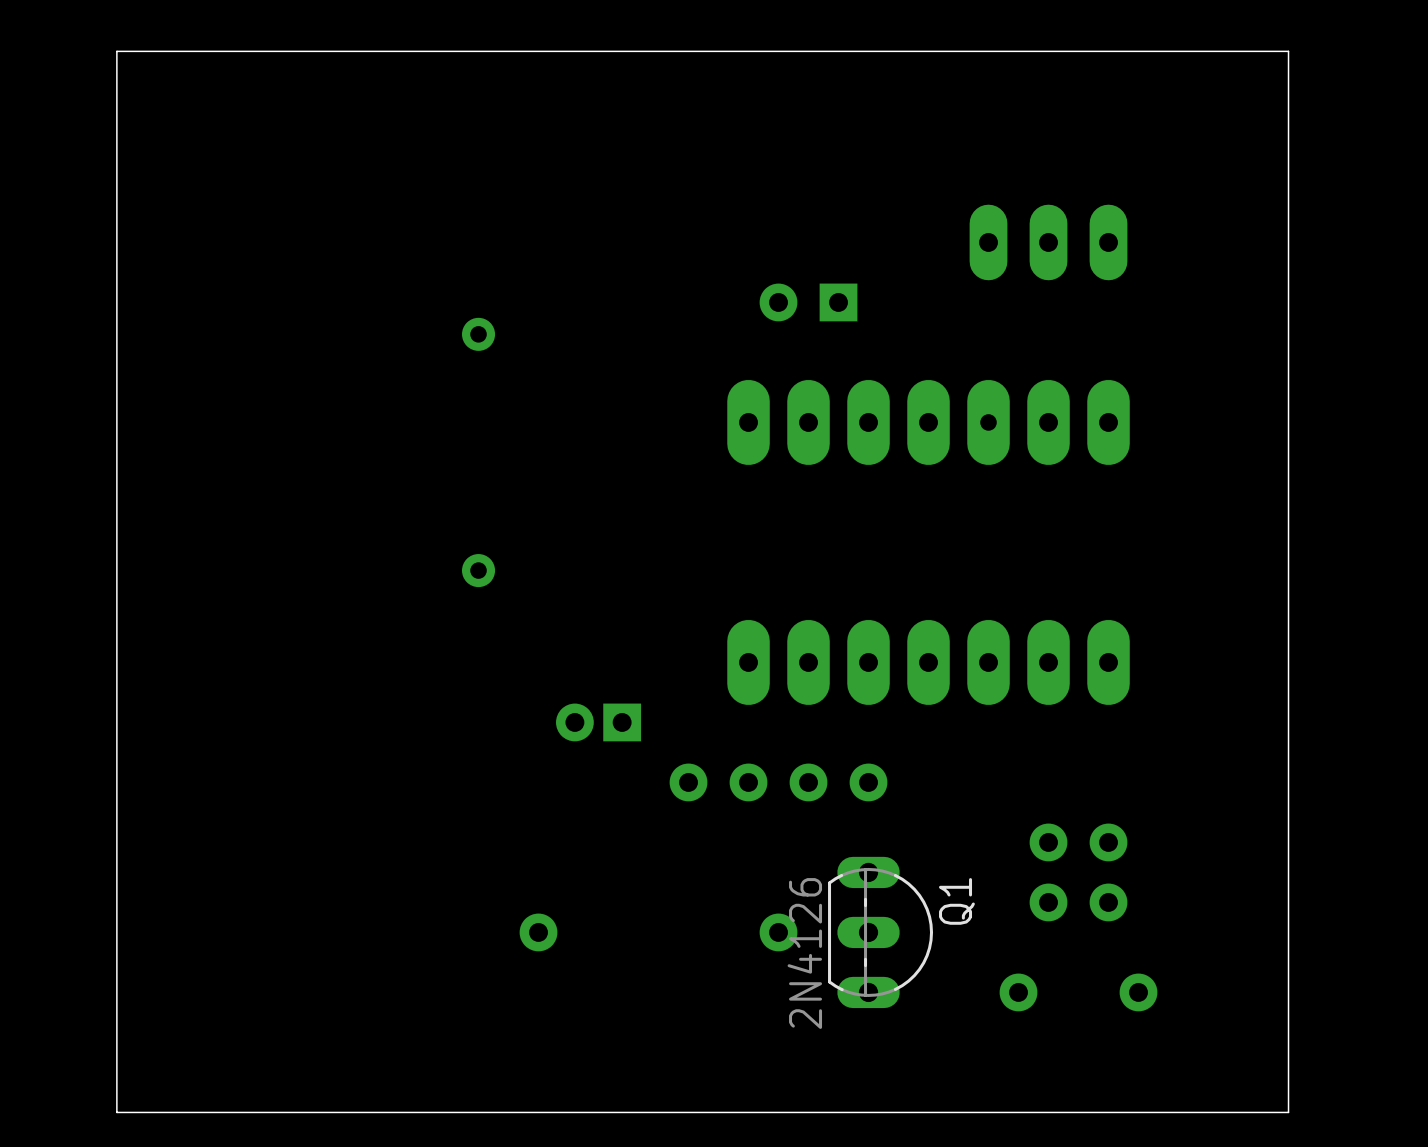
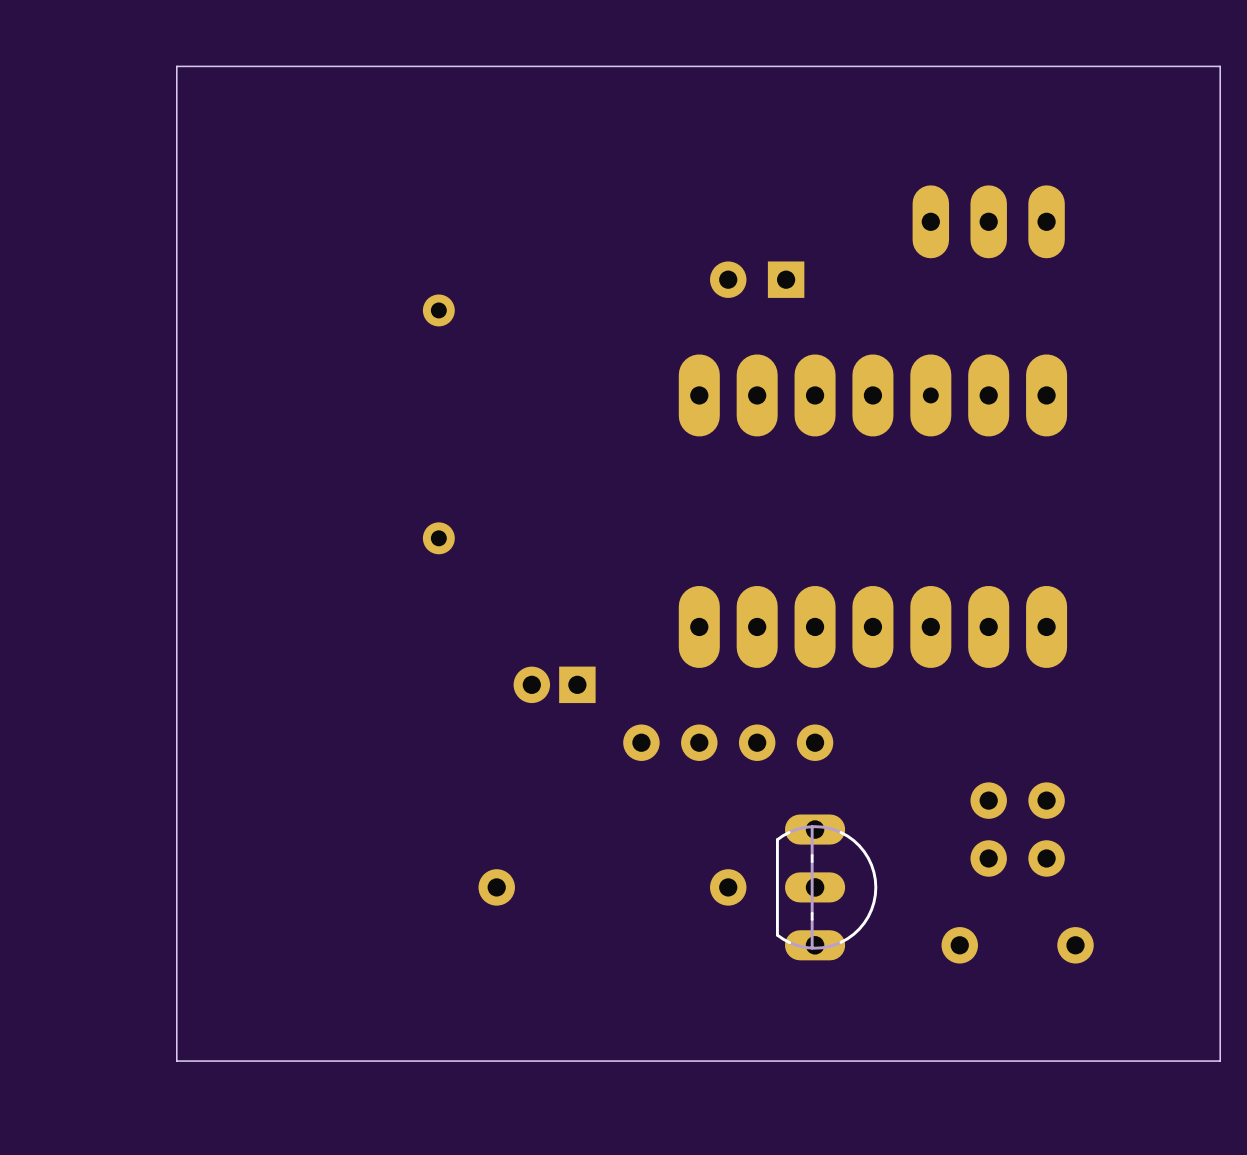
board edge: (1288, 81) (1288, 51) (116, 51) (116, 1112) (206, 1112) -> (1220, 66) (176, 66) (176, 1061)
Q1 name: Q1 (956, 901) -> none
Q1 value: 2N4126 (804, 953) -> none

